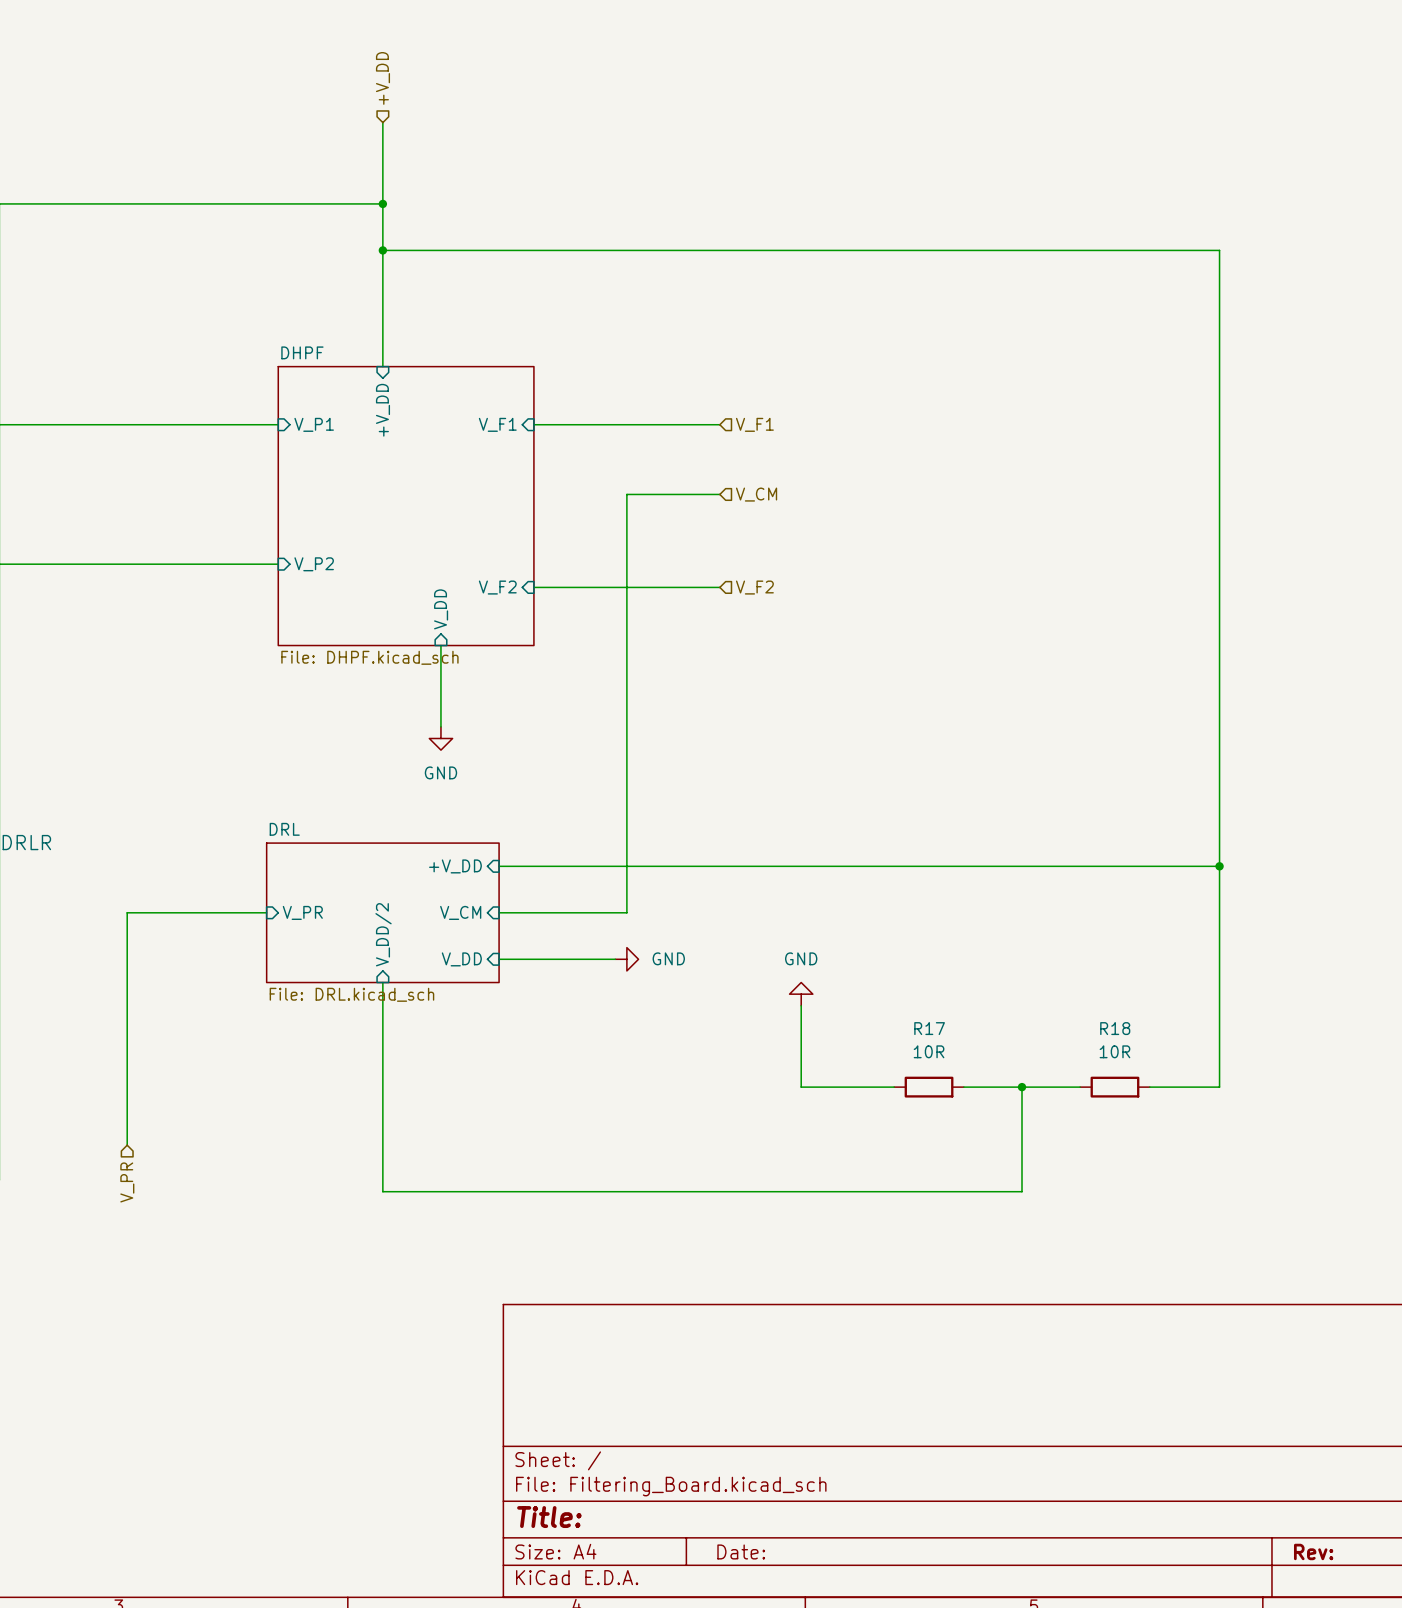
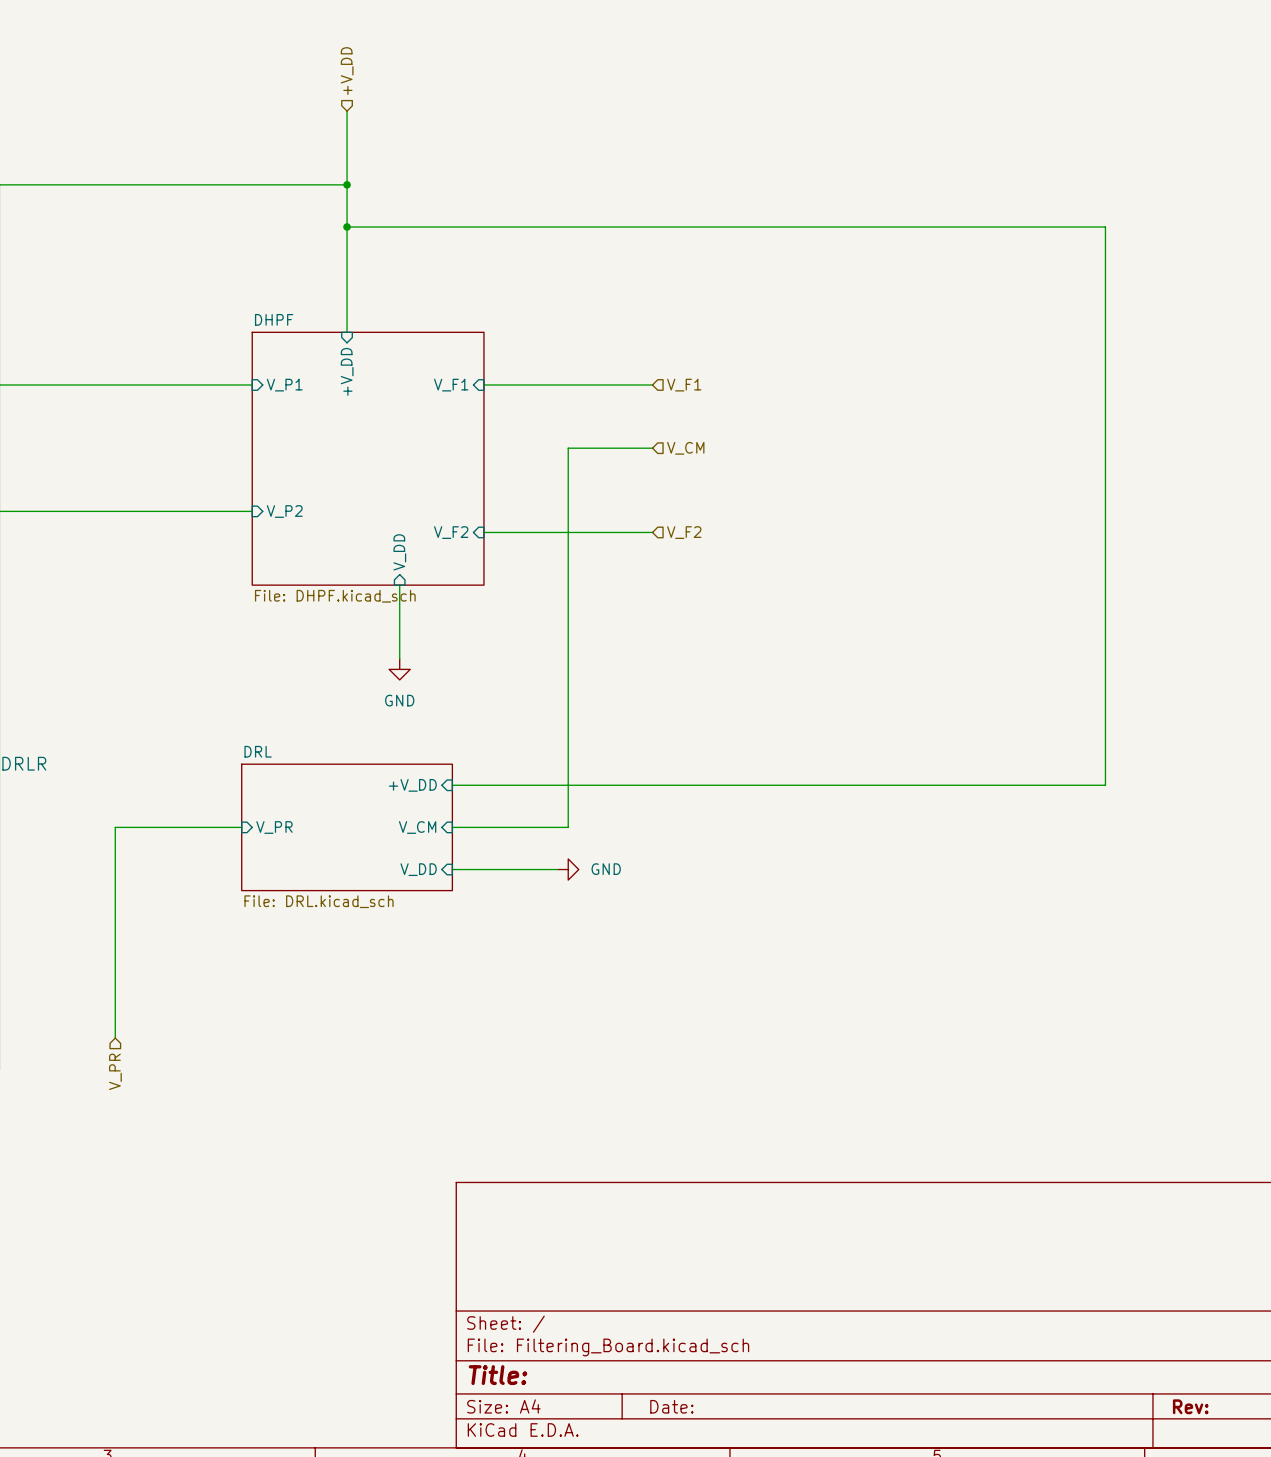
wire: (1219, 866) (1219, 1087) (1149, 1087) -> none
junction: (1219, 866) -> none
sheet pin: V_DD/2 (383, 934) -> none
wire: (382, 982) (382, 1191) (1022, 1191) (1022, 1087) -> none
power symbol: GND (801, 994) -> none
wire: (801, 1005) (801, 1087) (894, 1087) -> none
R17: 10R (929, 1087) -> none
wire: (963, 1087) (1080, 1087) -> none
junction: (1022, 1087) -> none
R18: 10R (1114, 1087) -> none

